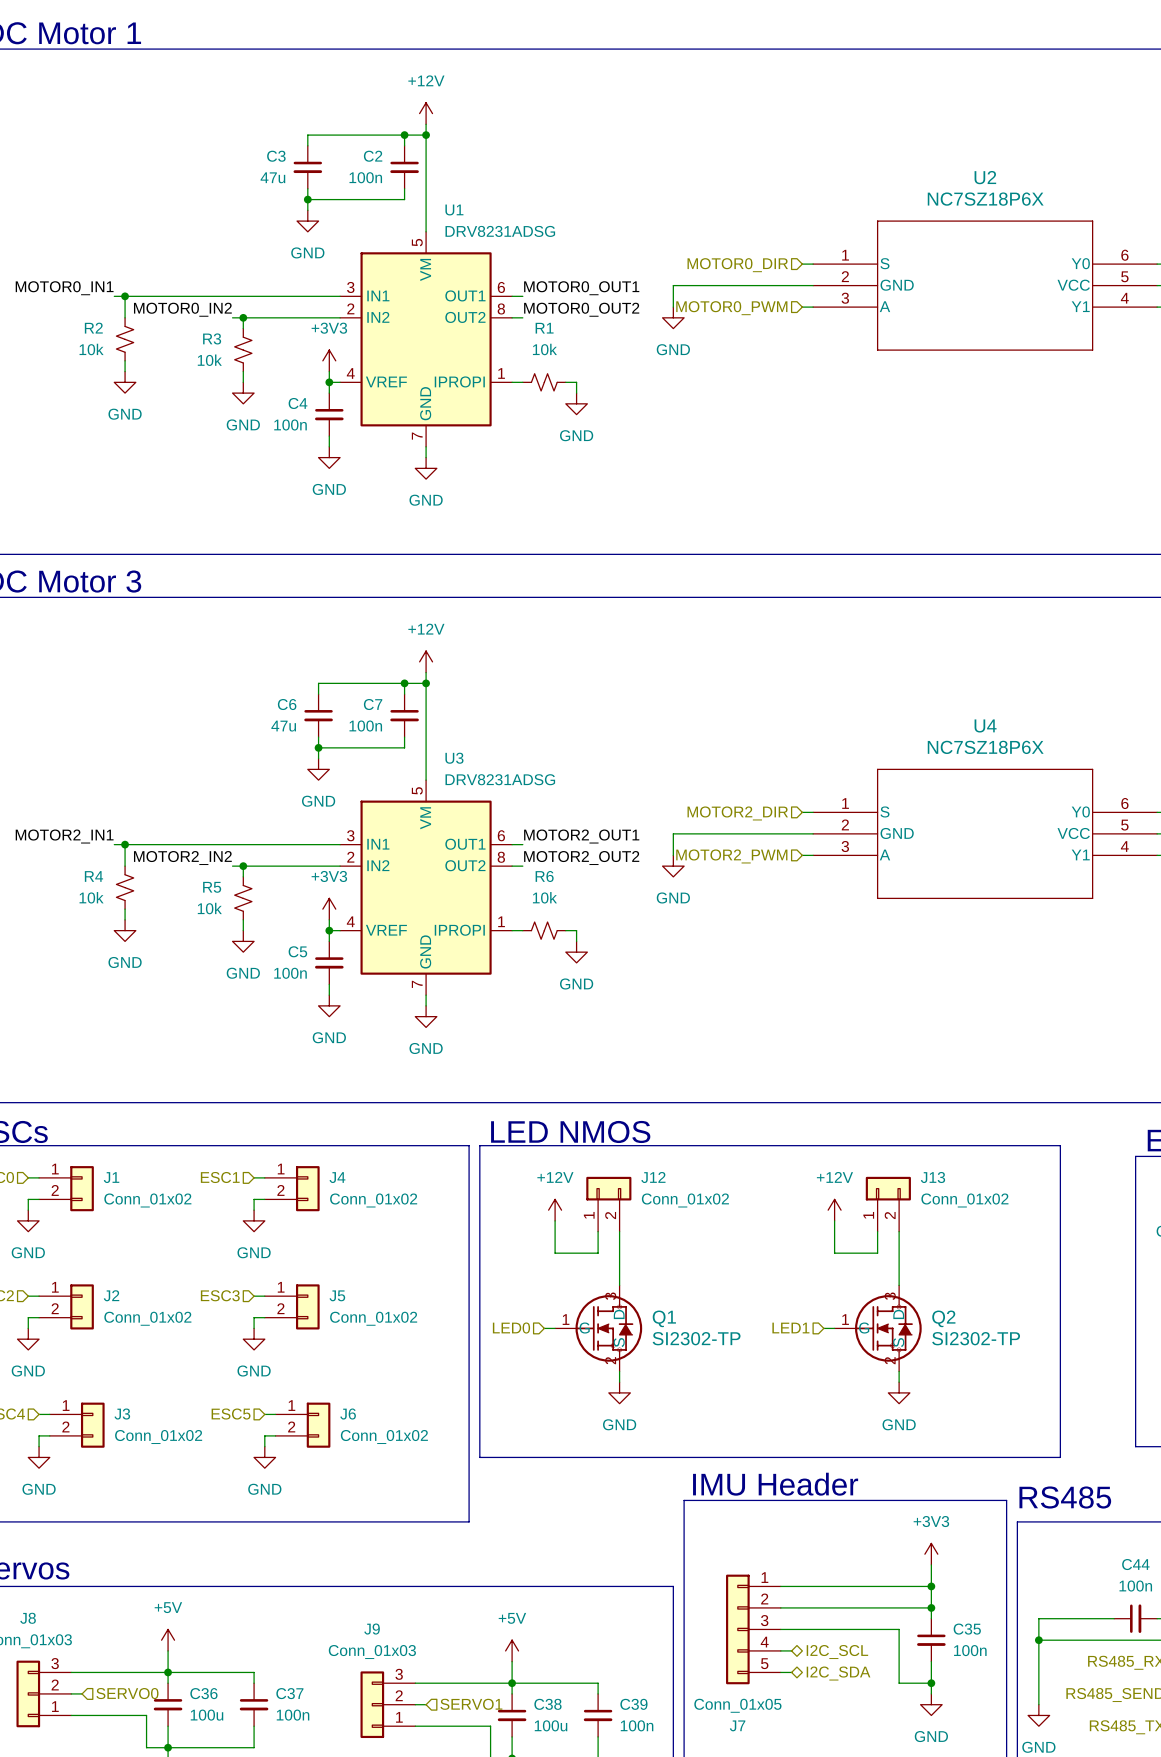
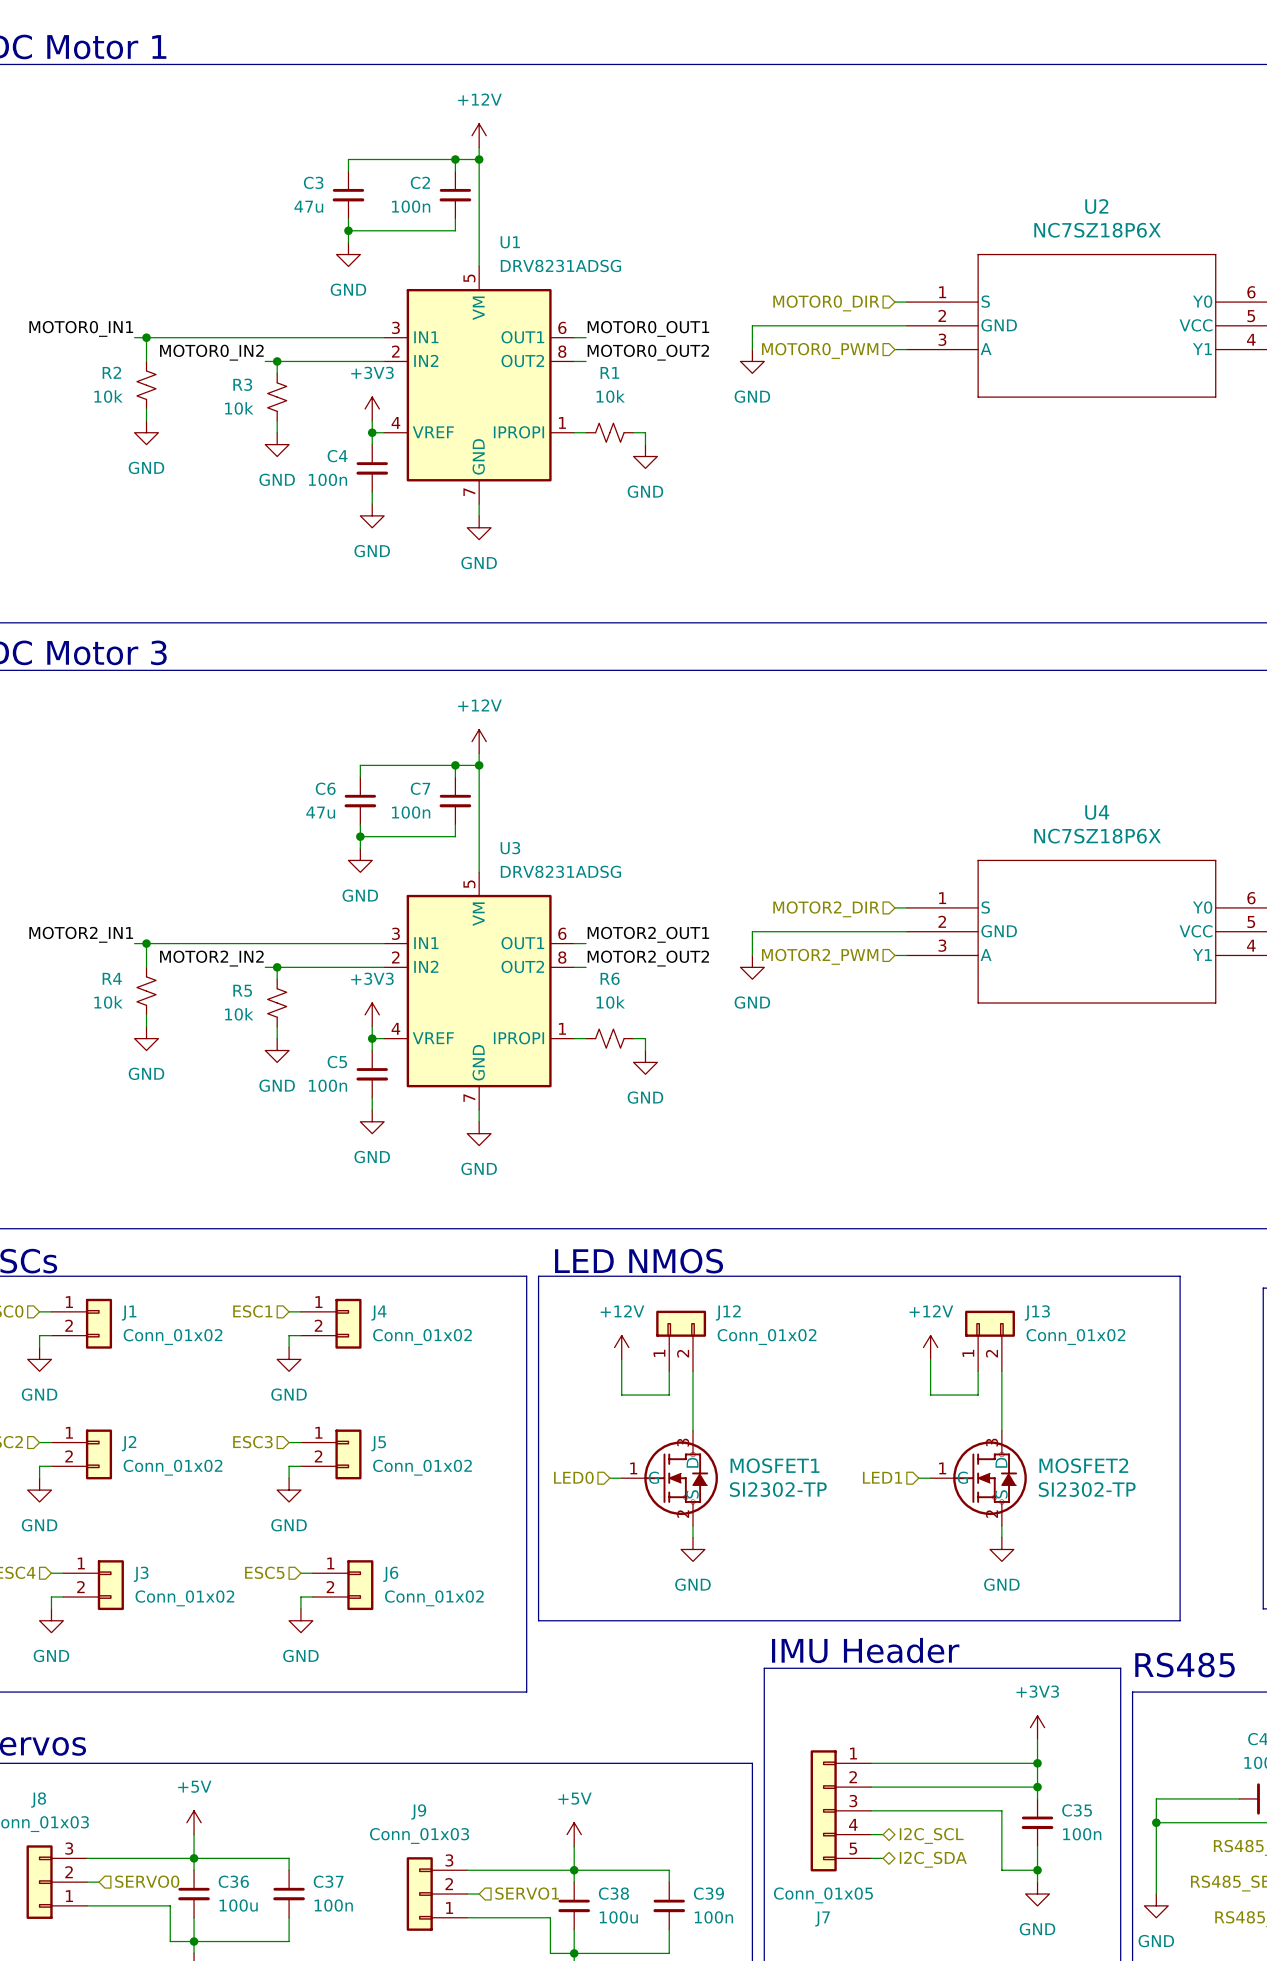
Q1 name: Q1 (664, 1318) -> MOSFET1 (775, 1465)
Q2 name: Q2 (943, 1318) -> MOSFET2 (1083, 1465)

